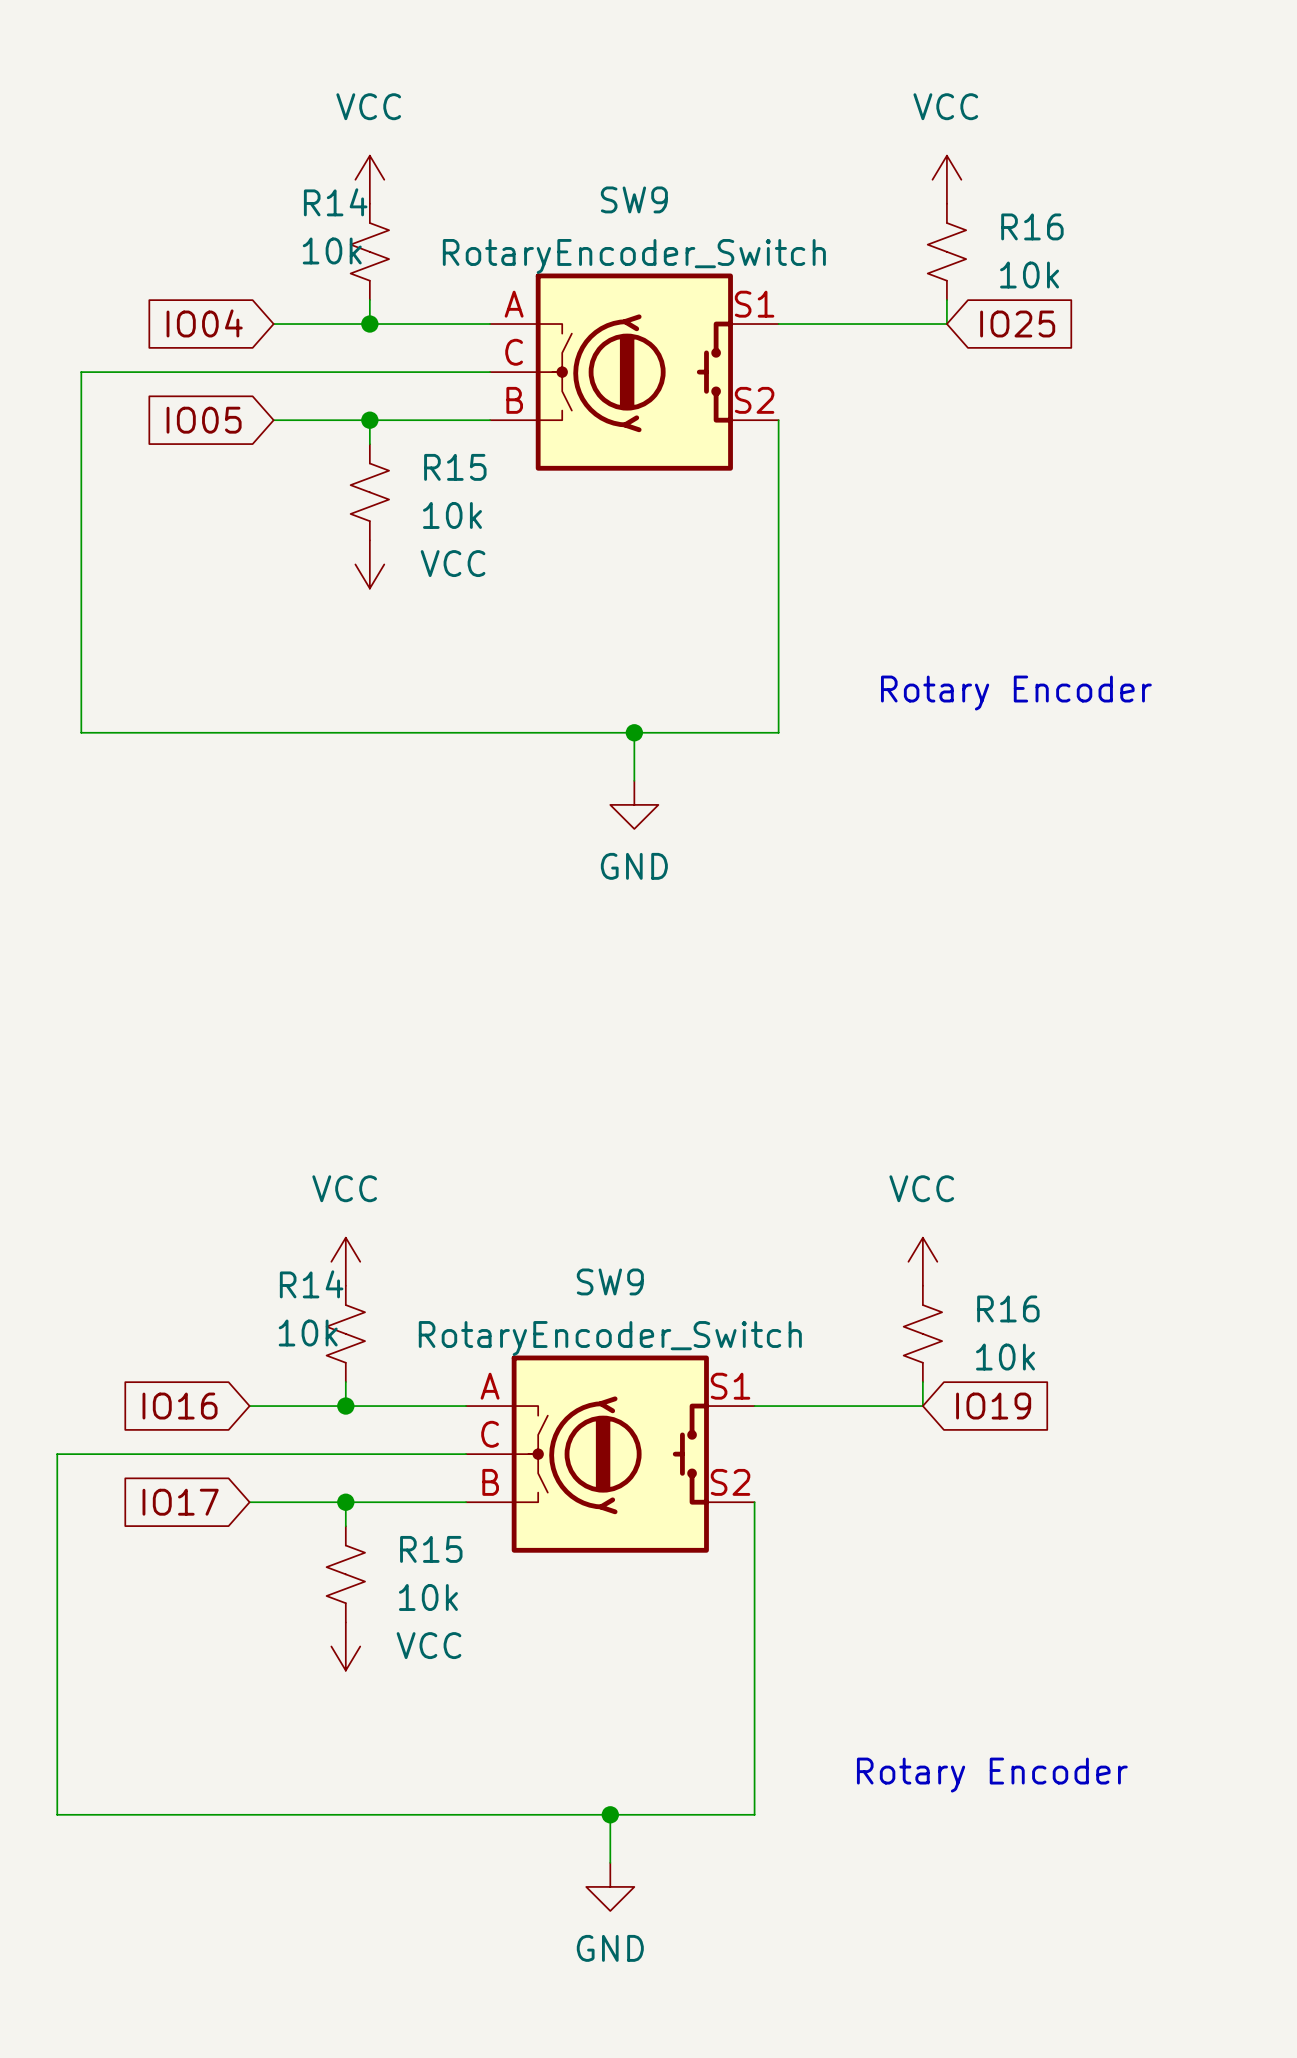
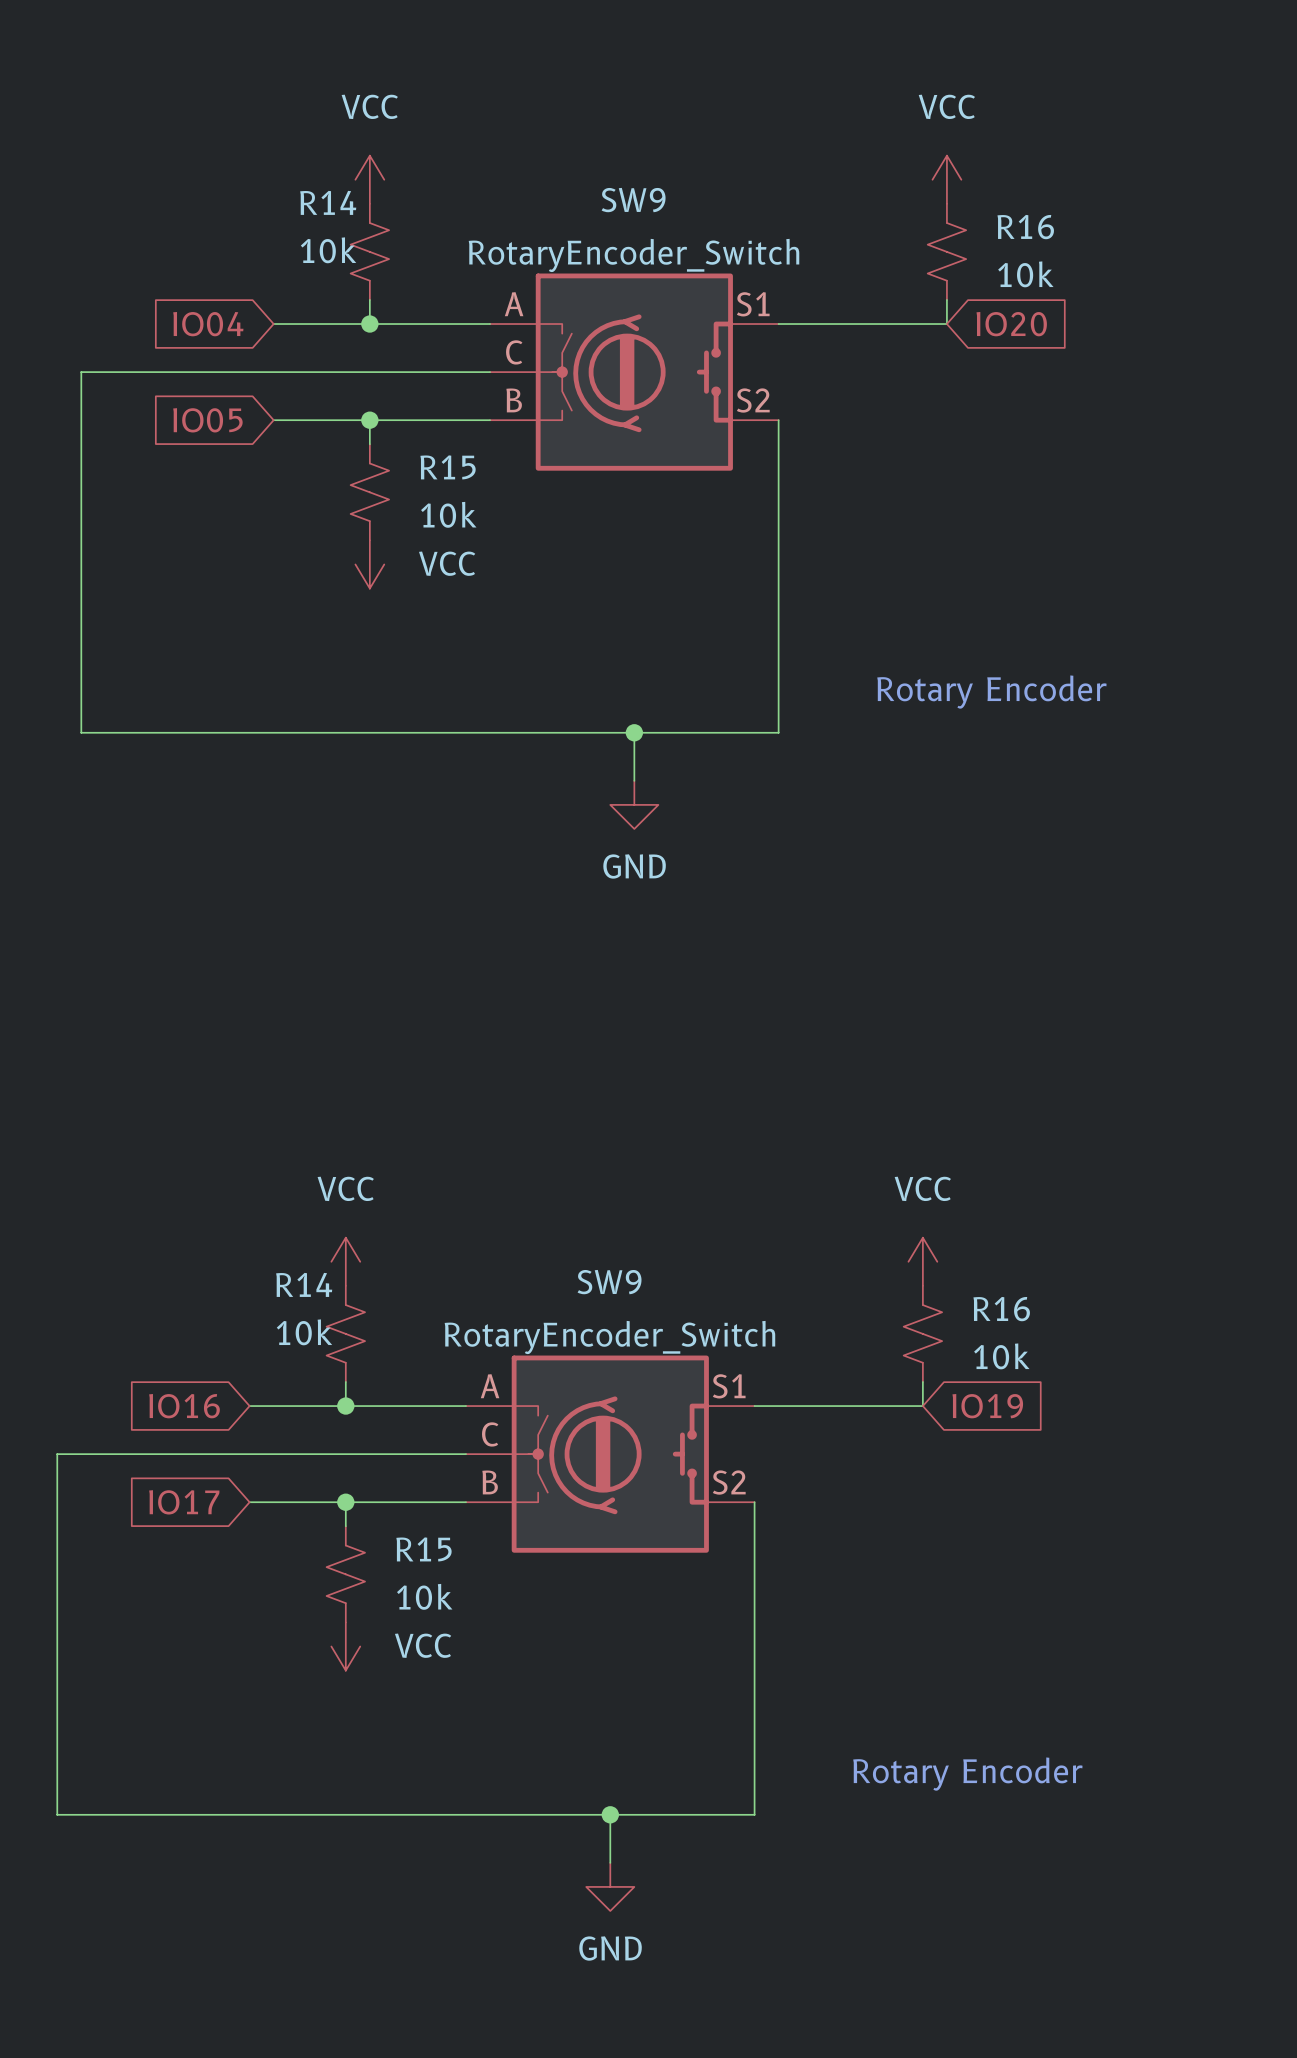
global label: IO25 (1017, 324) -> IO20 (1011, 324)

